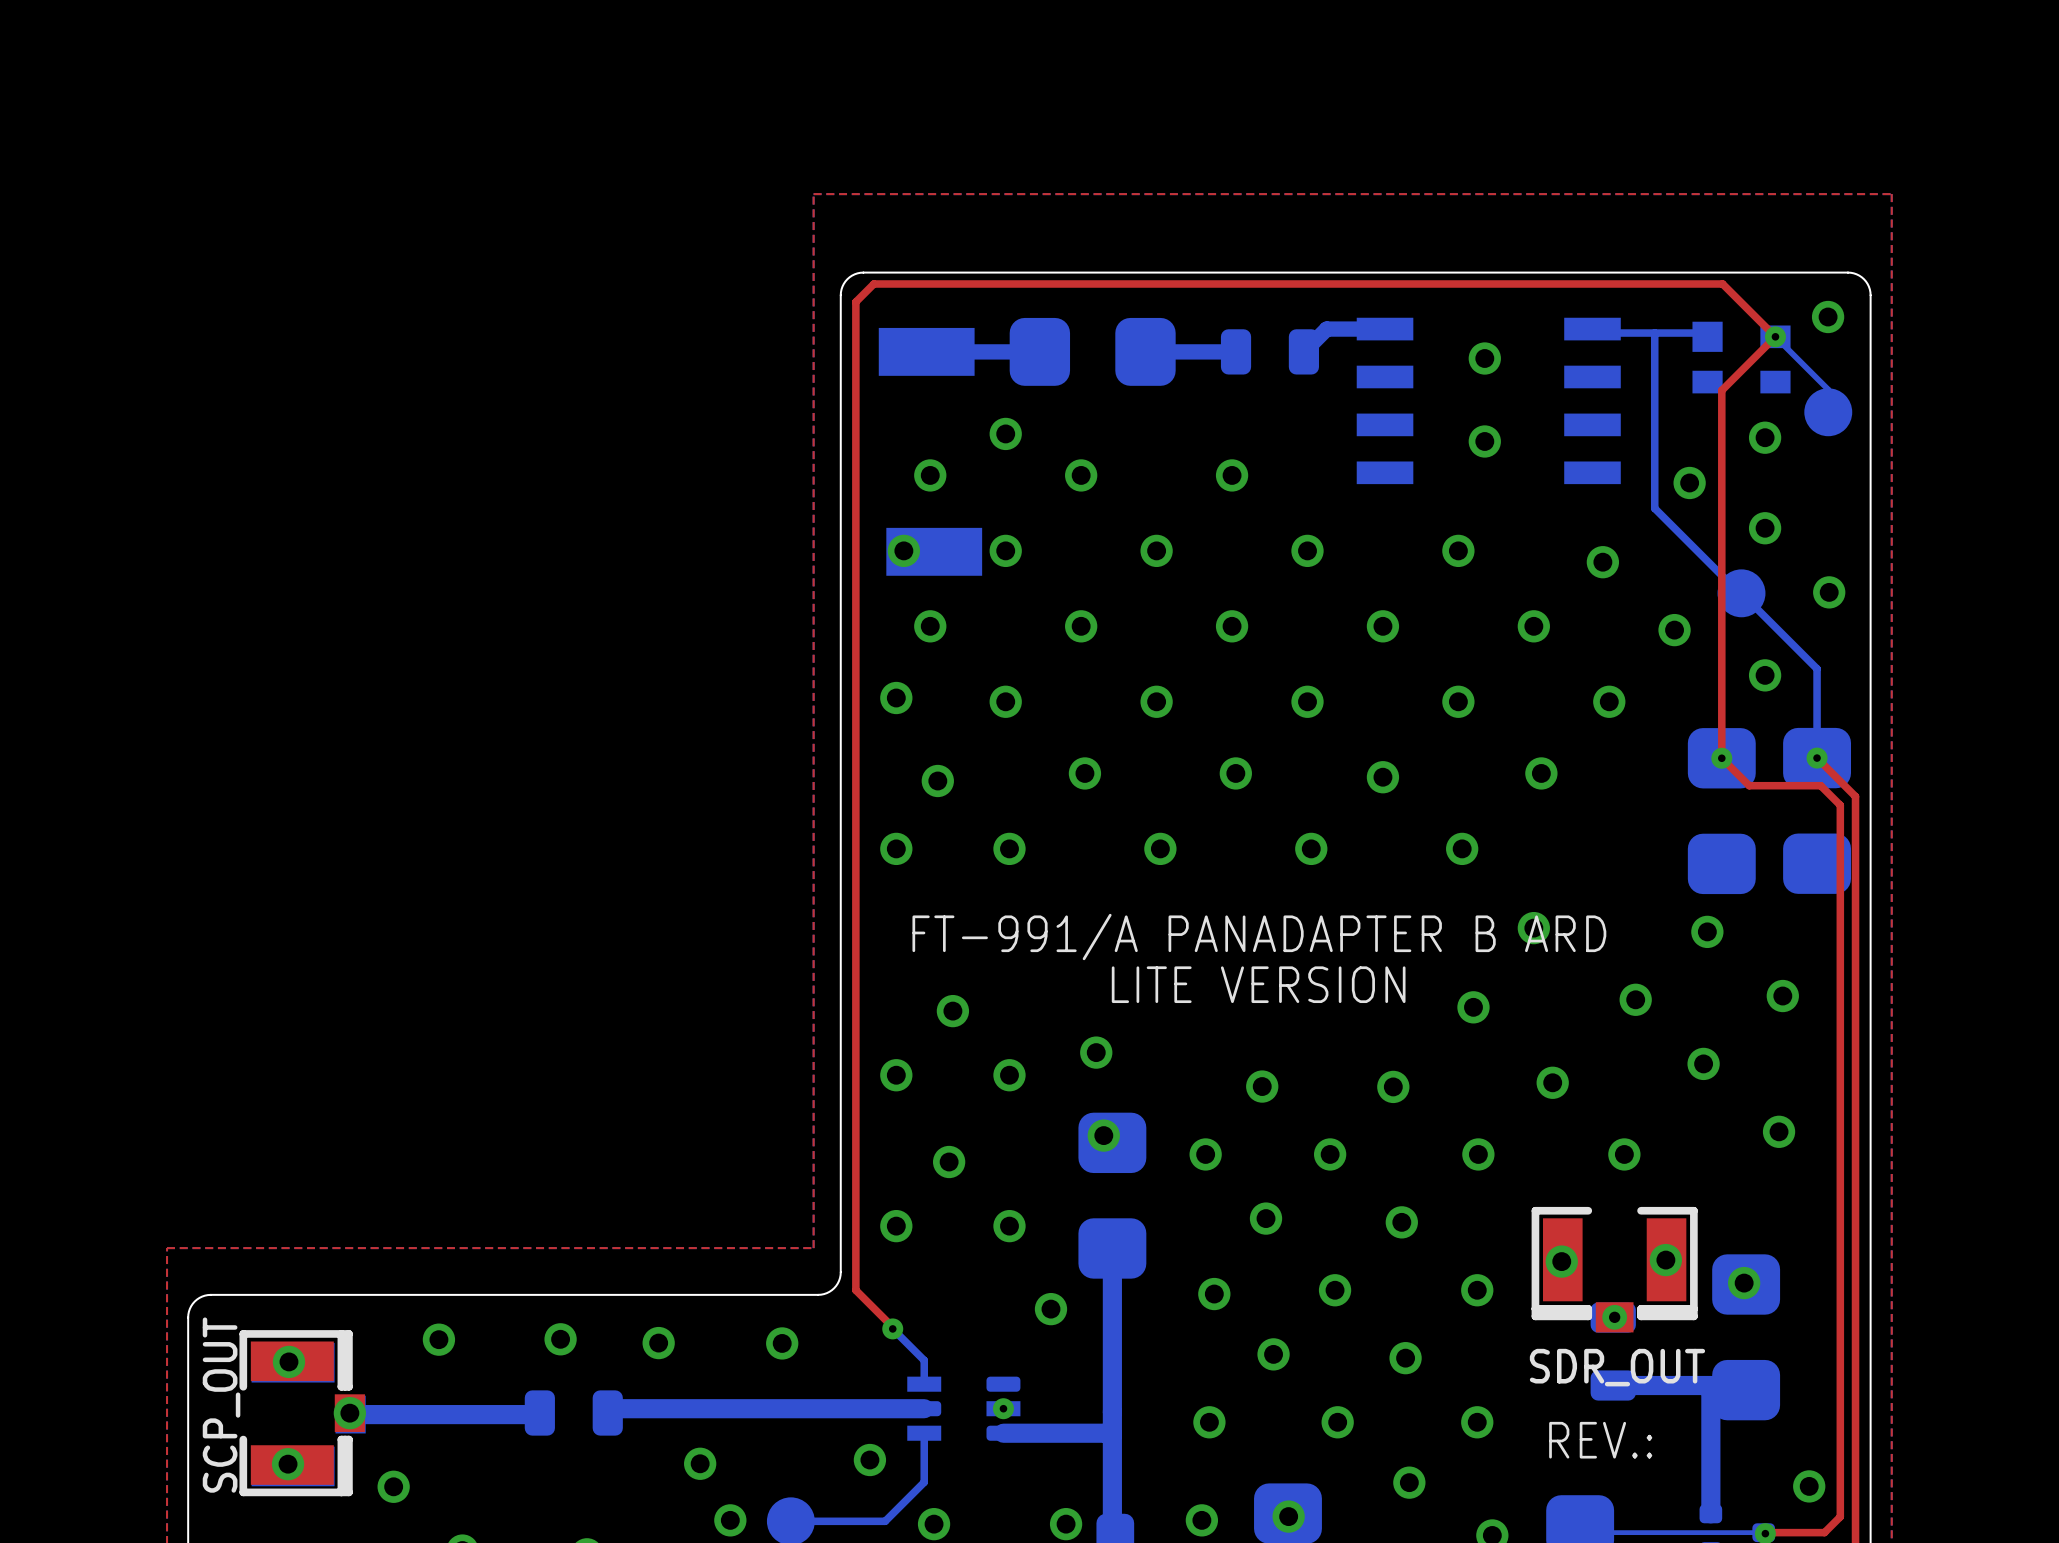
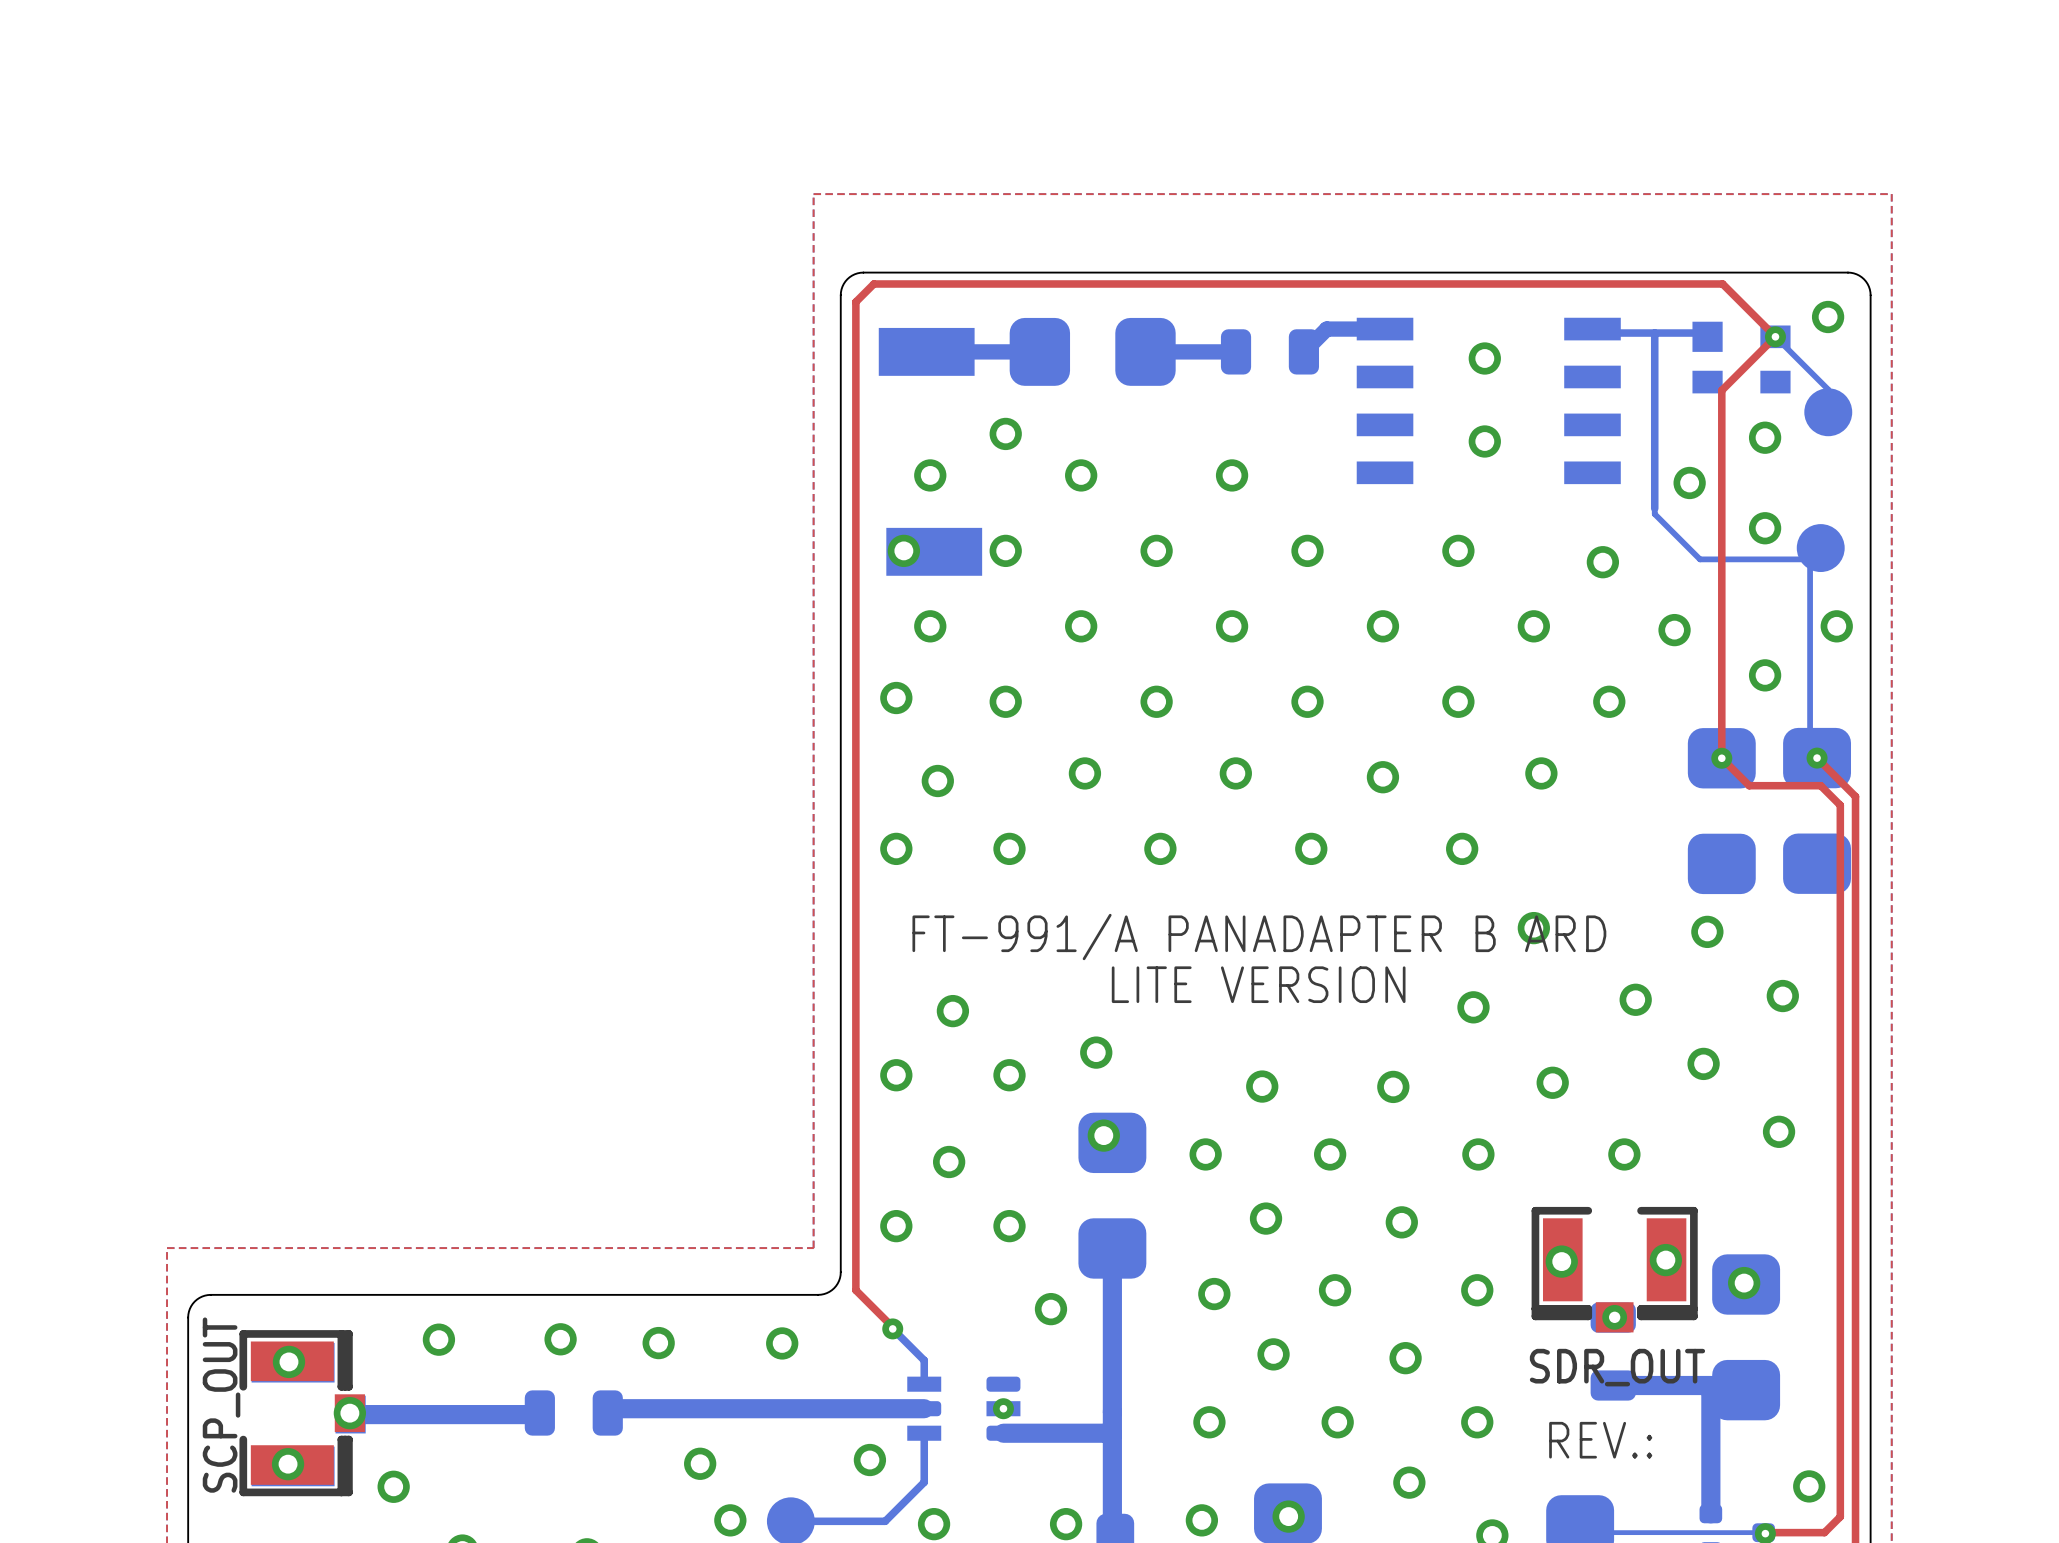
bottom track: (1654, 508) (1817, 668) (1817, 758) -> (1654, 508) (1654, 514) (1700, 559) (1809, 559) (1820, 548) (1813, 548)
bottom track: none -> (1810, 558) (1810, 751) (1817, 758) (1820, 754)
via position: (1829, 592) -> (1836, 626)
part position: (1741, 593) -> (1820, 548)

